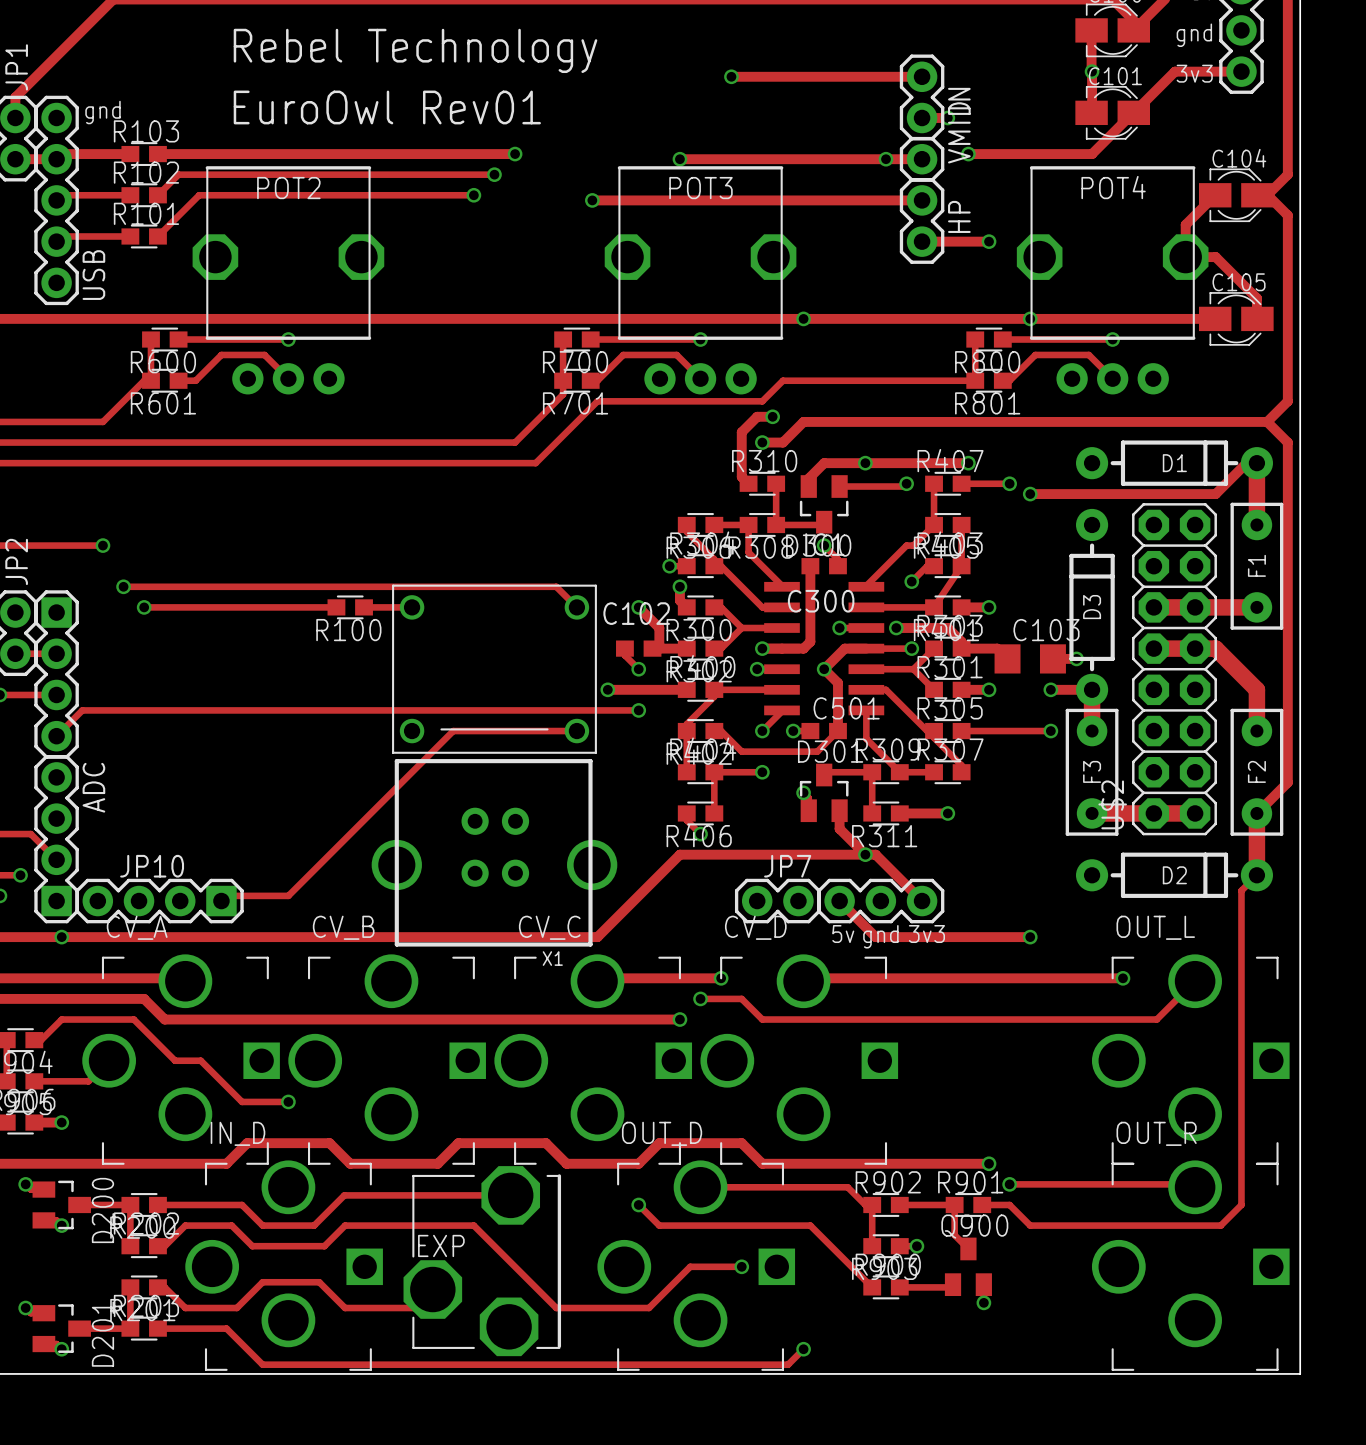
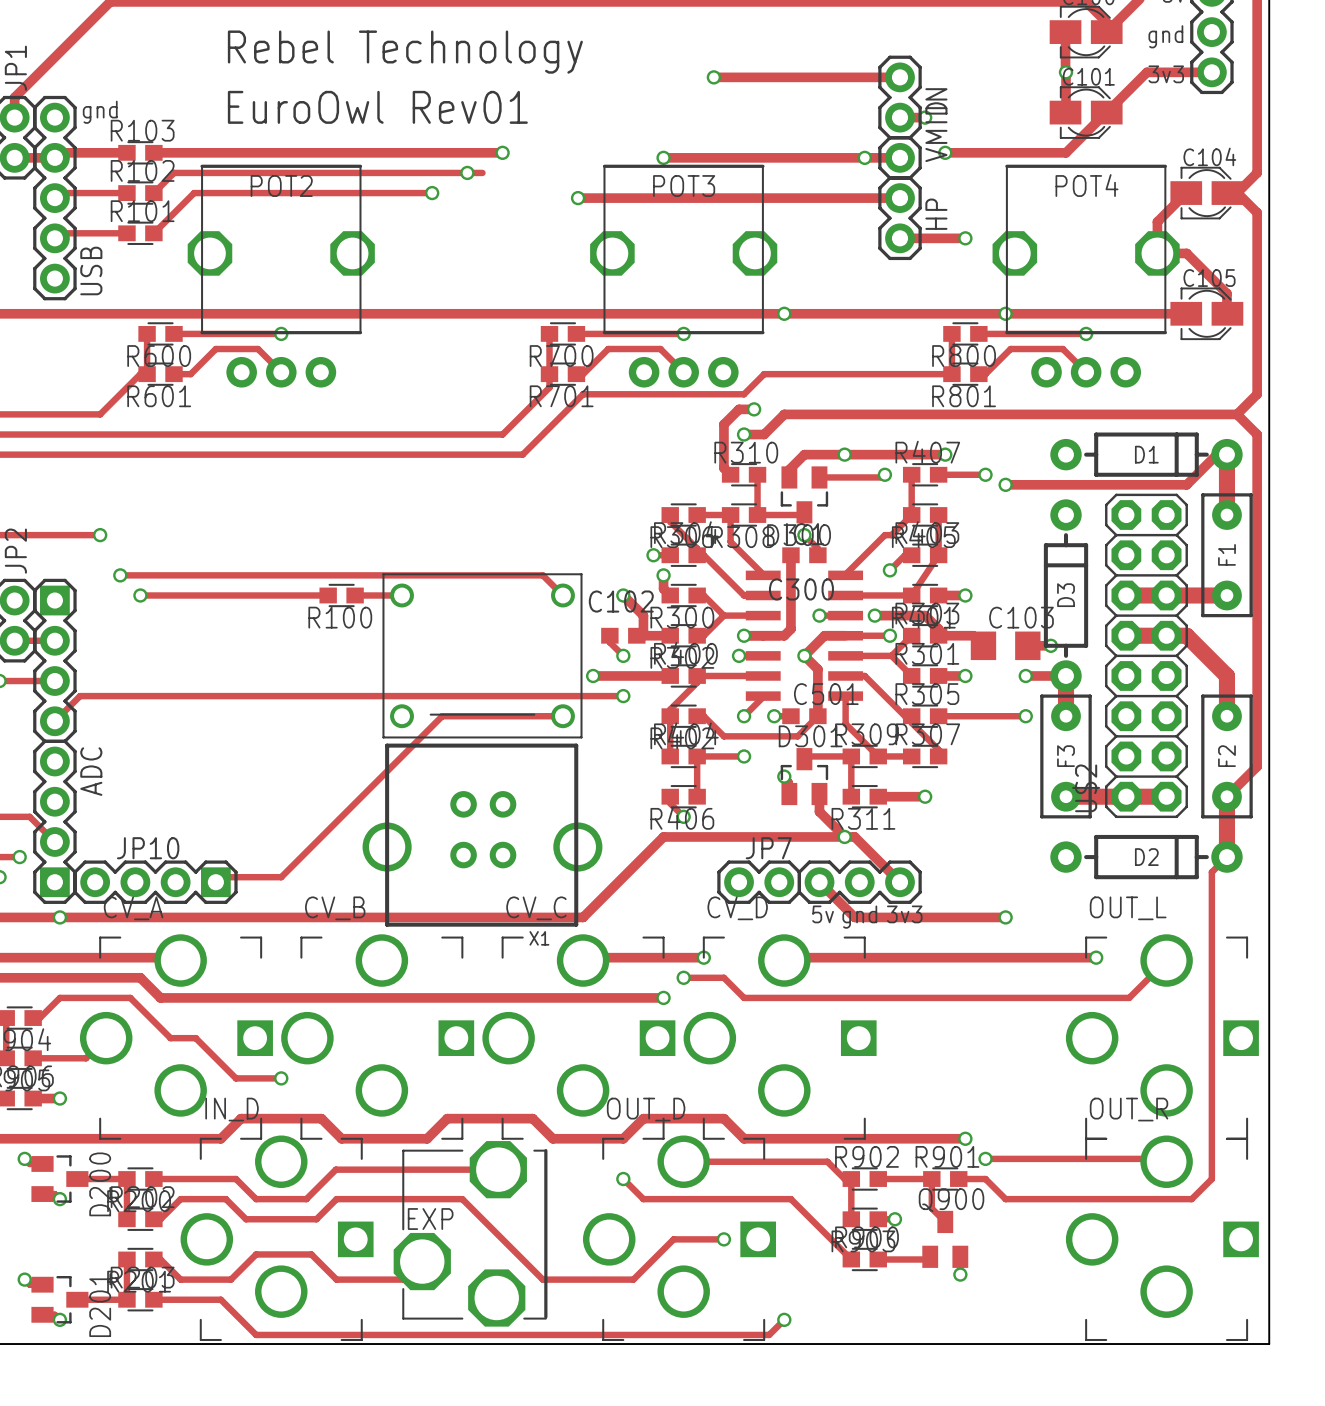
via: none -> (467, 172)
via: (494, 174) -> none
track: (442, 195) (473, 195) -> none
via: none -> (432, 193)
via: (473, 195) -> none

